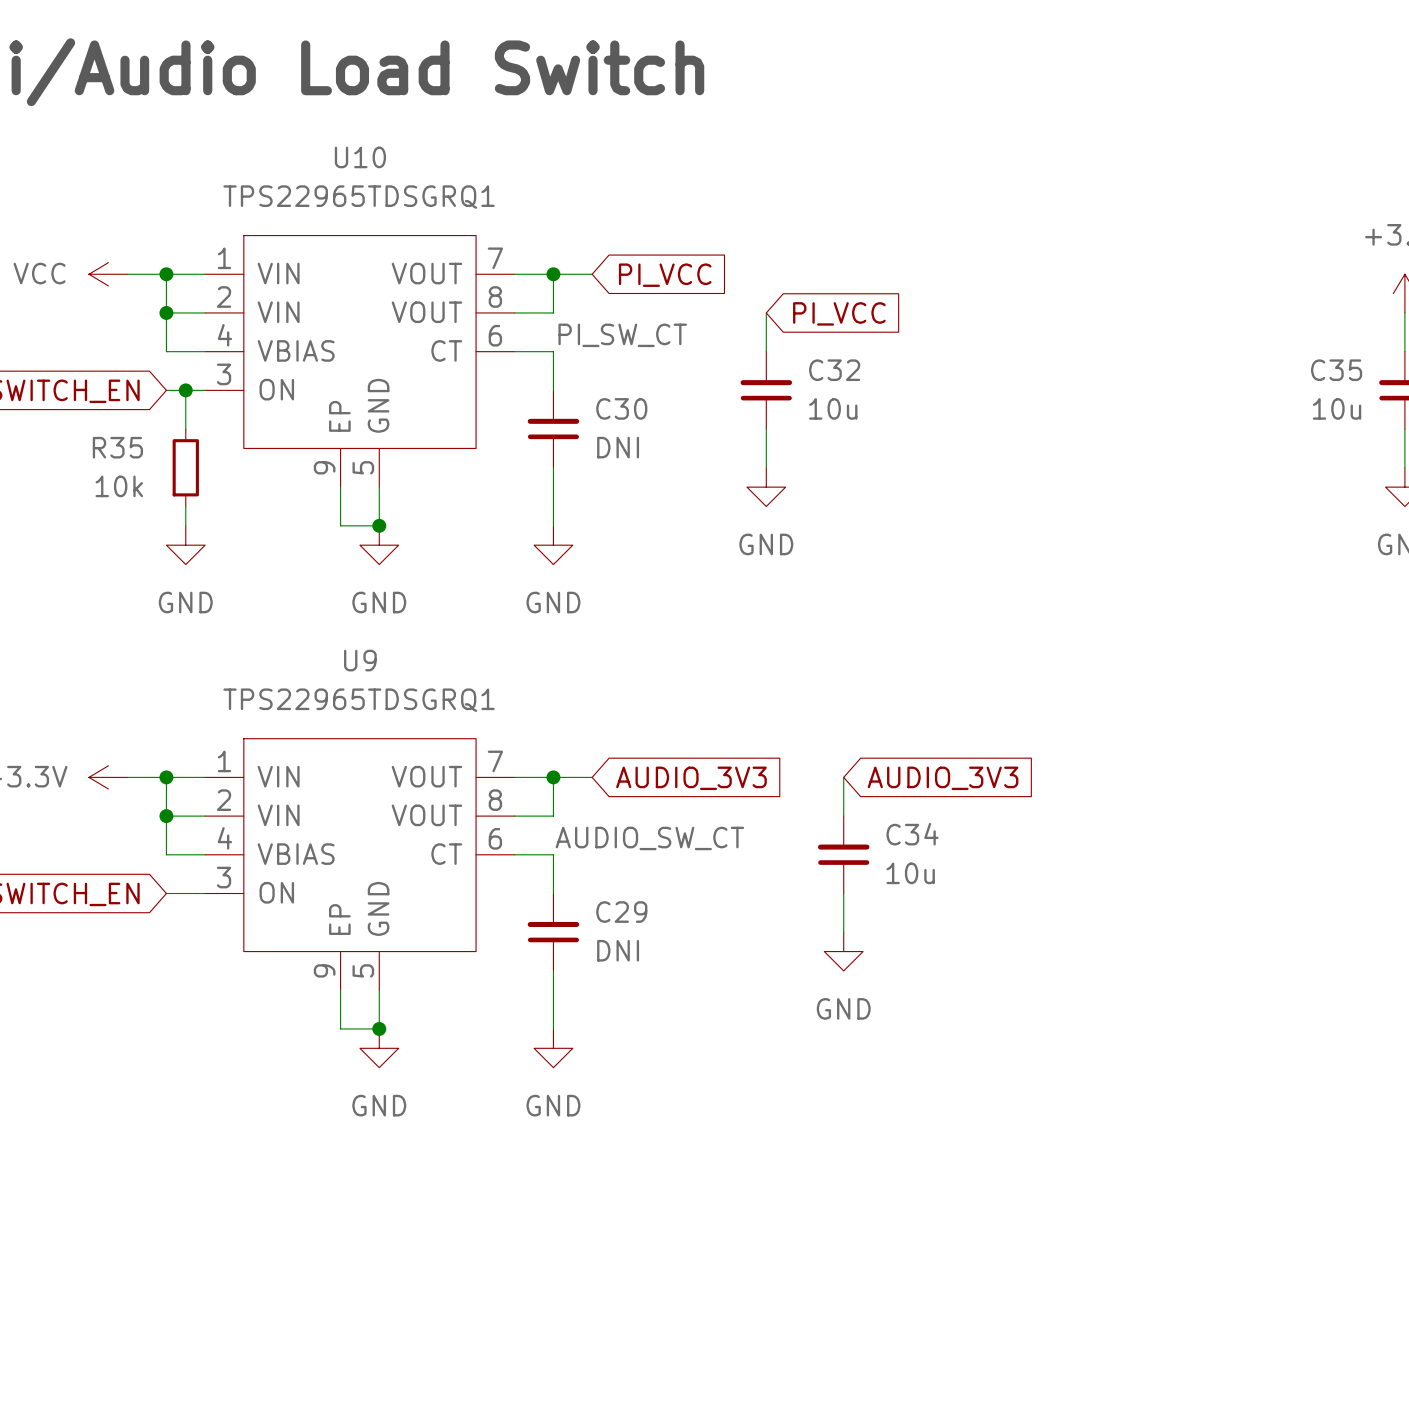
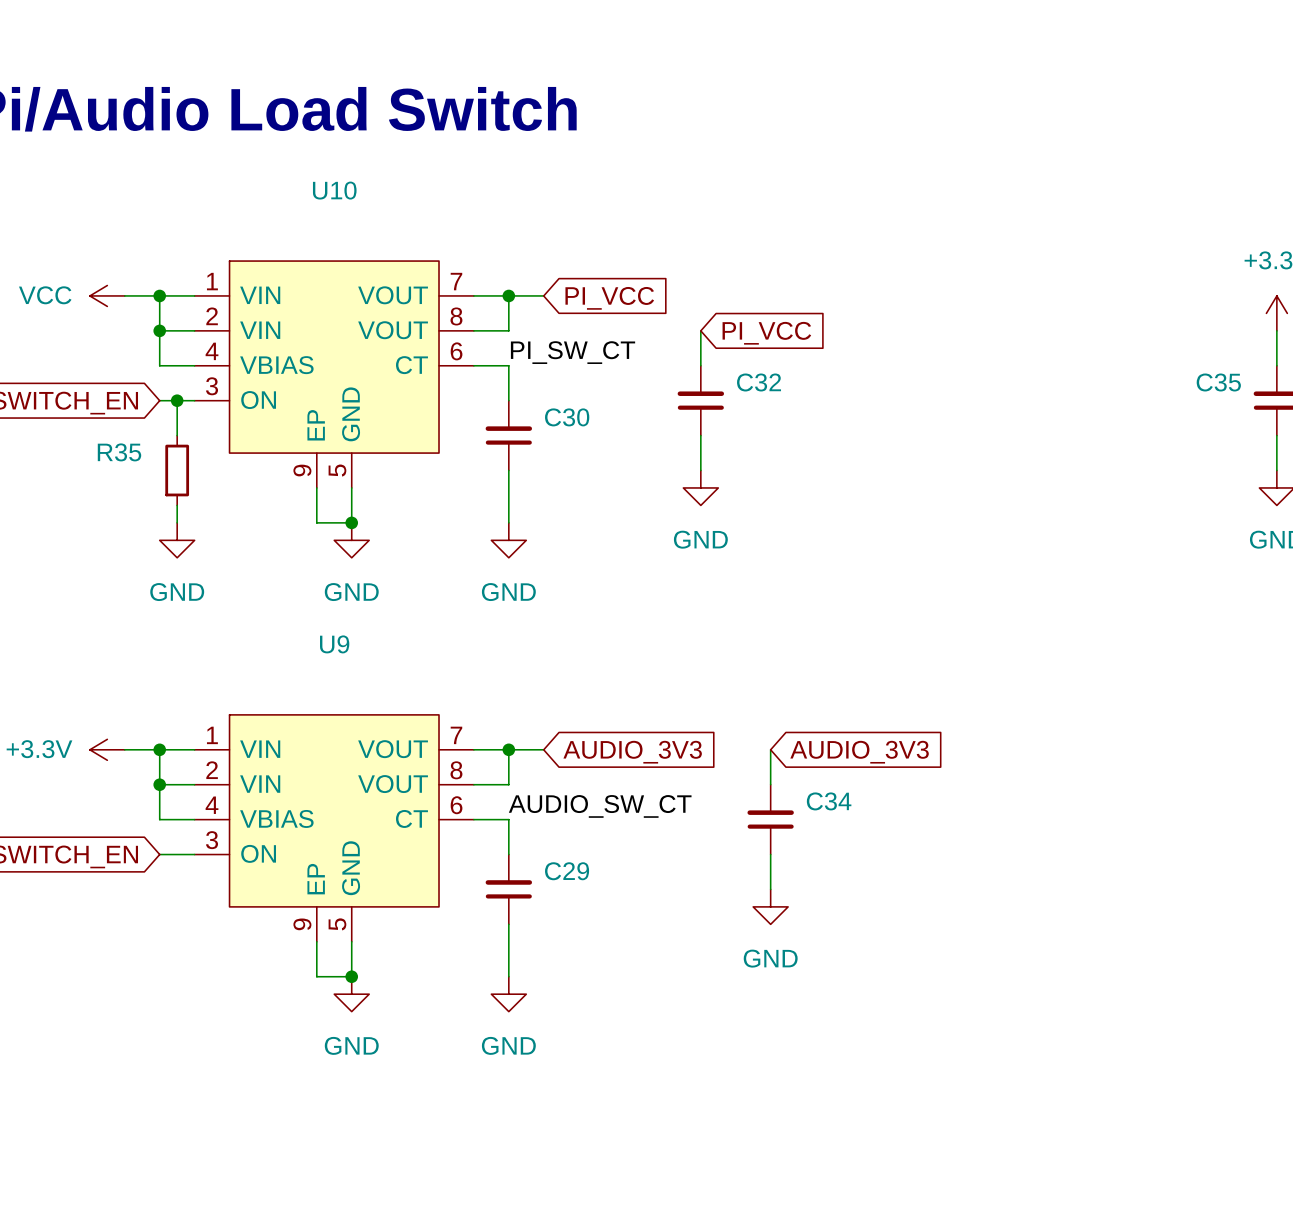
U10 value: TPS22965TDSGRQ1 (359, 197) -> none
C32 value: 10u (833, 408) -> none
C35 value: 10u (1337, 408) -> none
C30 value: DNI (618, 447) -> none
R35 value: 10k (119, 486) -> none
U9 value: TPS22965TDSGRQ1 (359, 700) -> none
C34 value: 10u (910, 873) -> none
C29 value: DNI (618, 950) -> none

